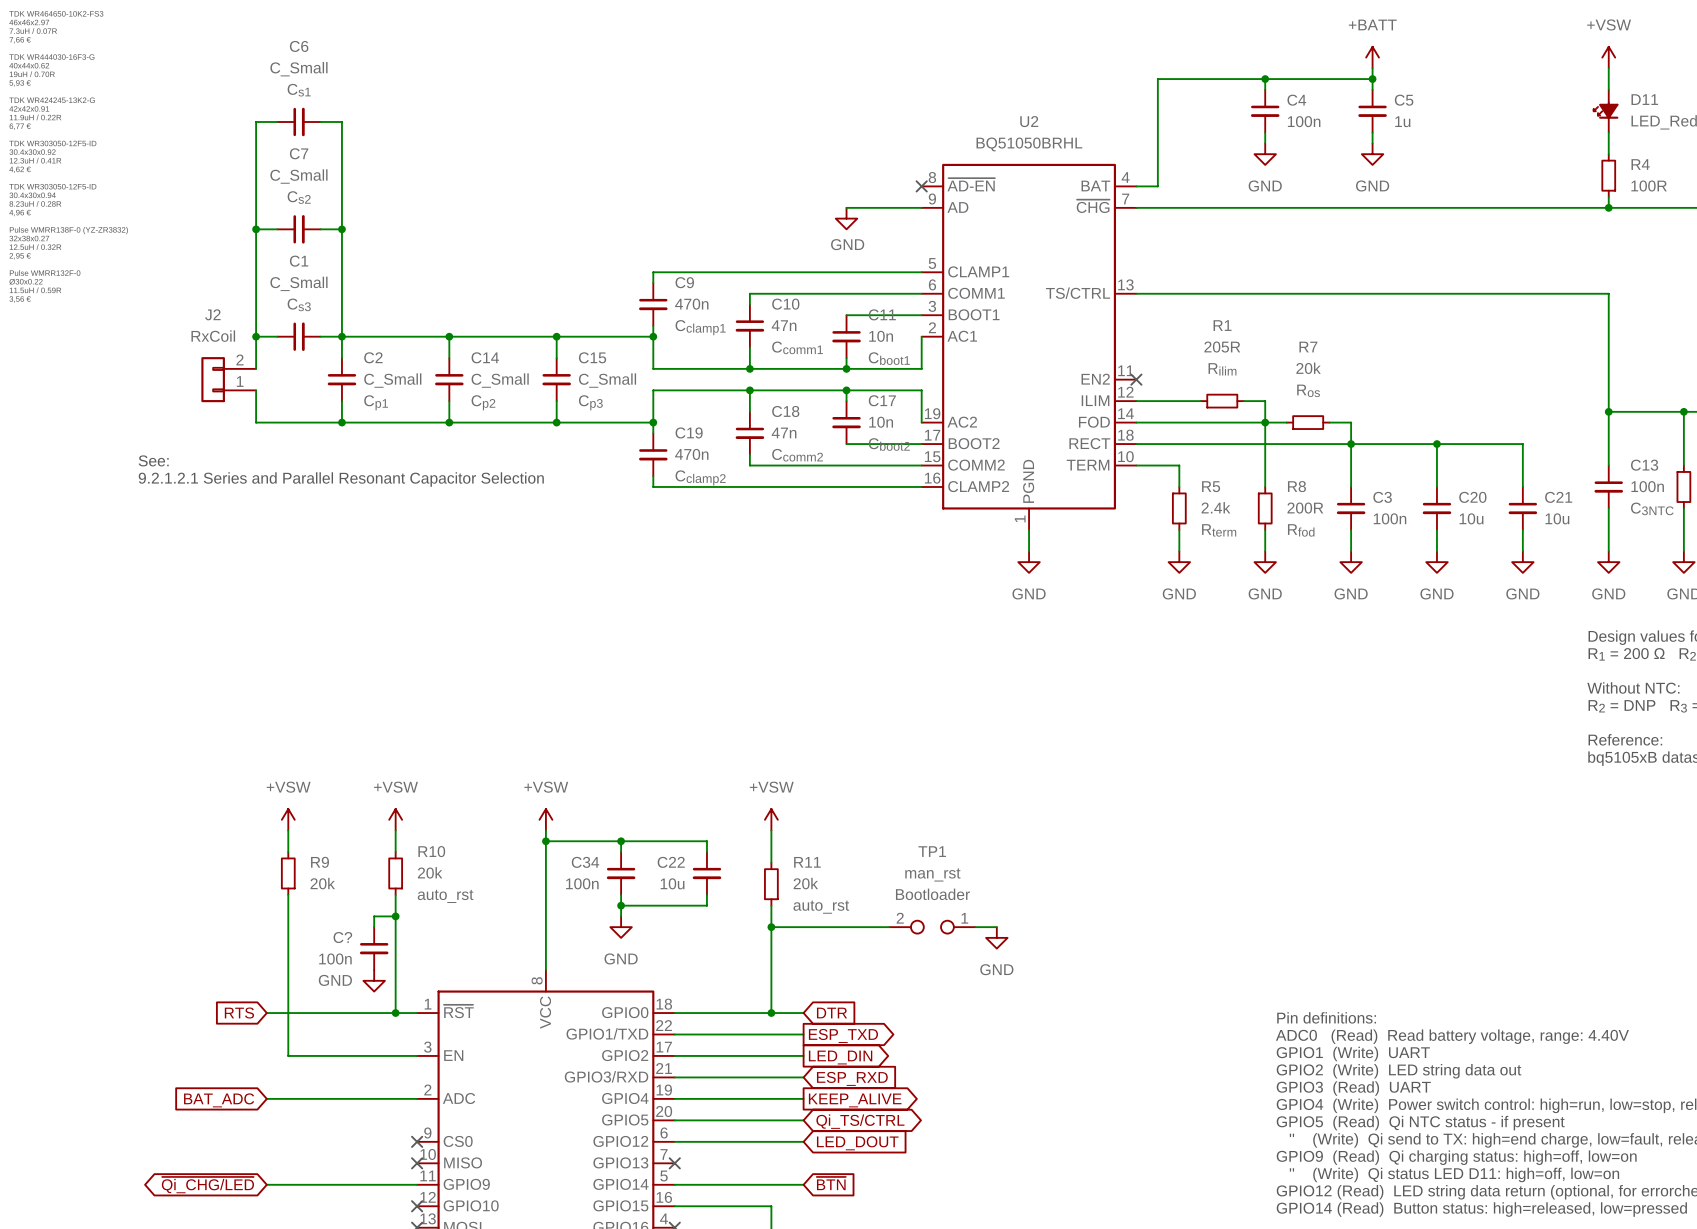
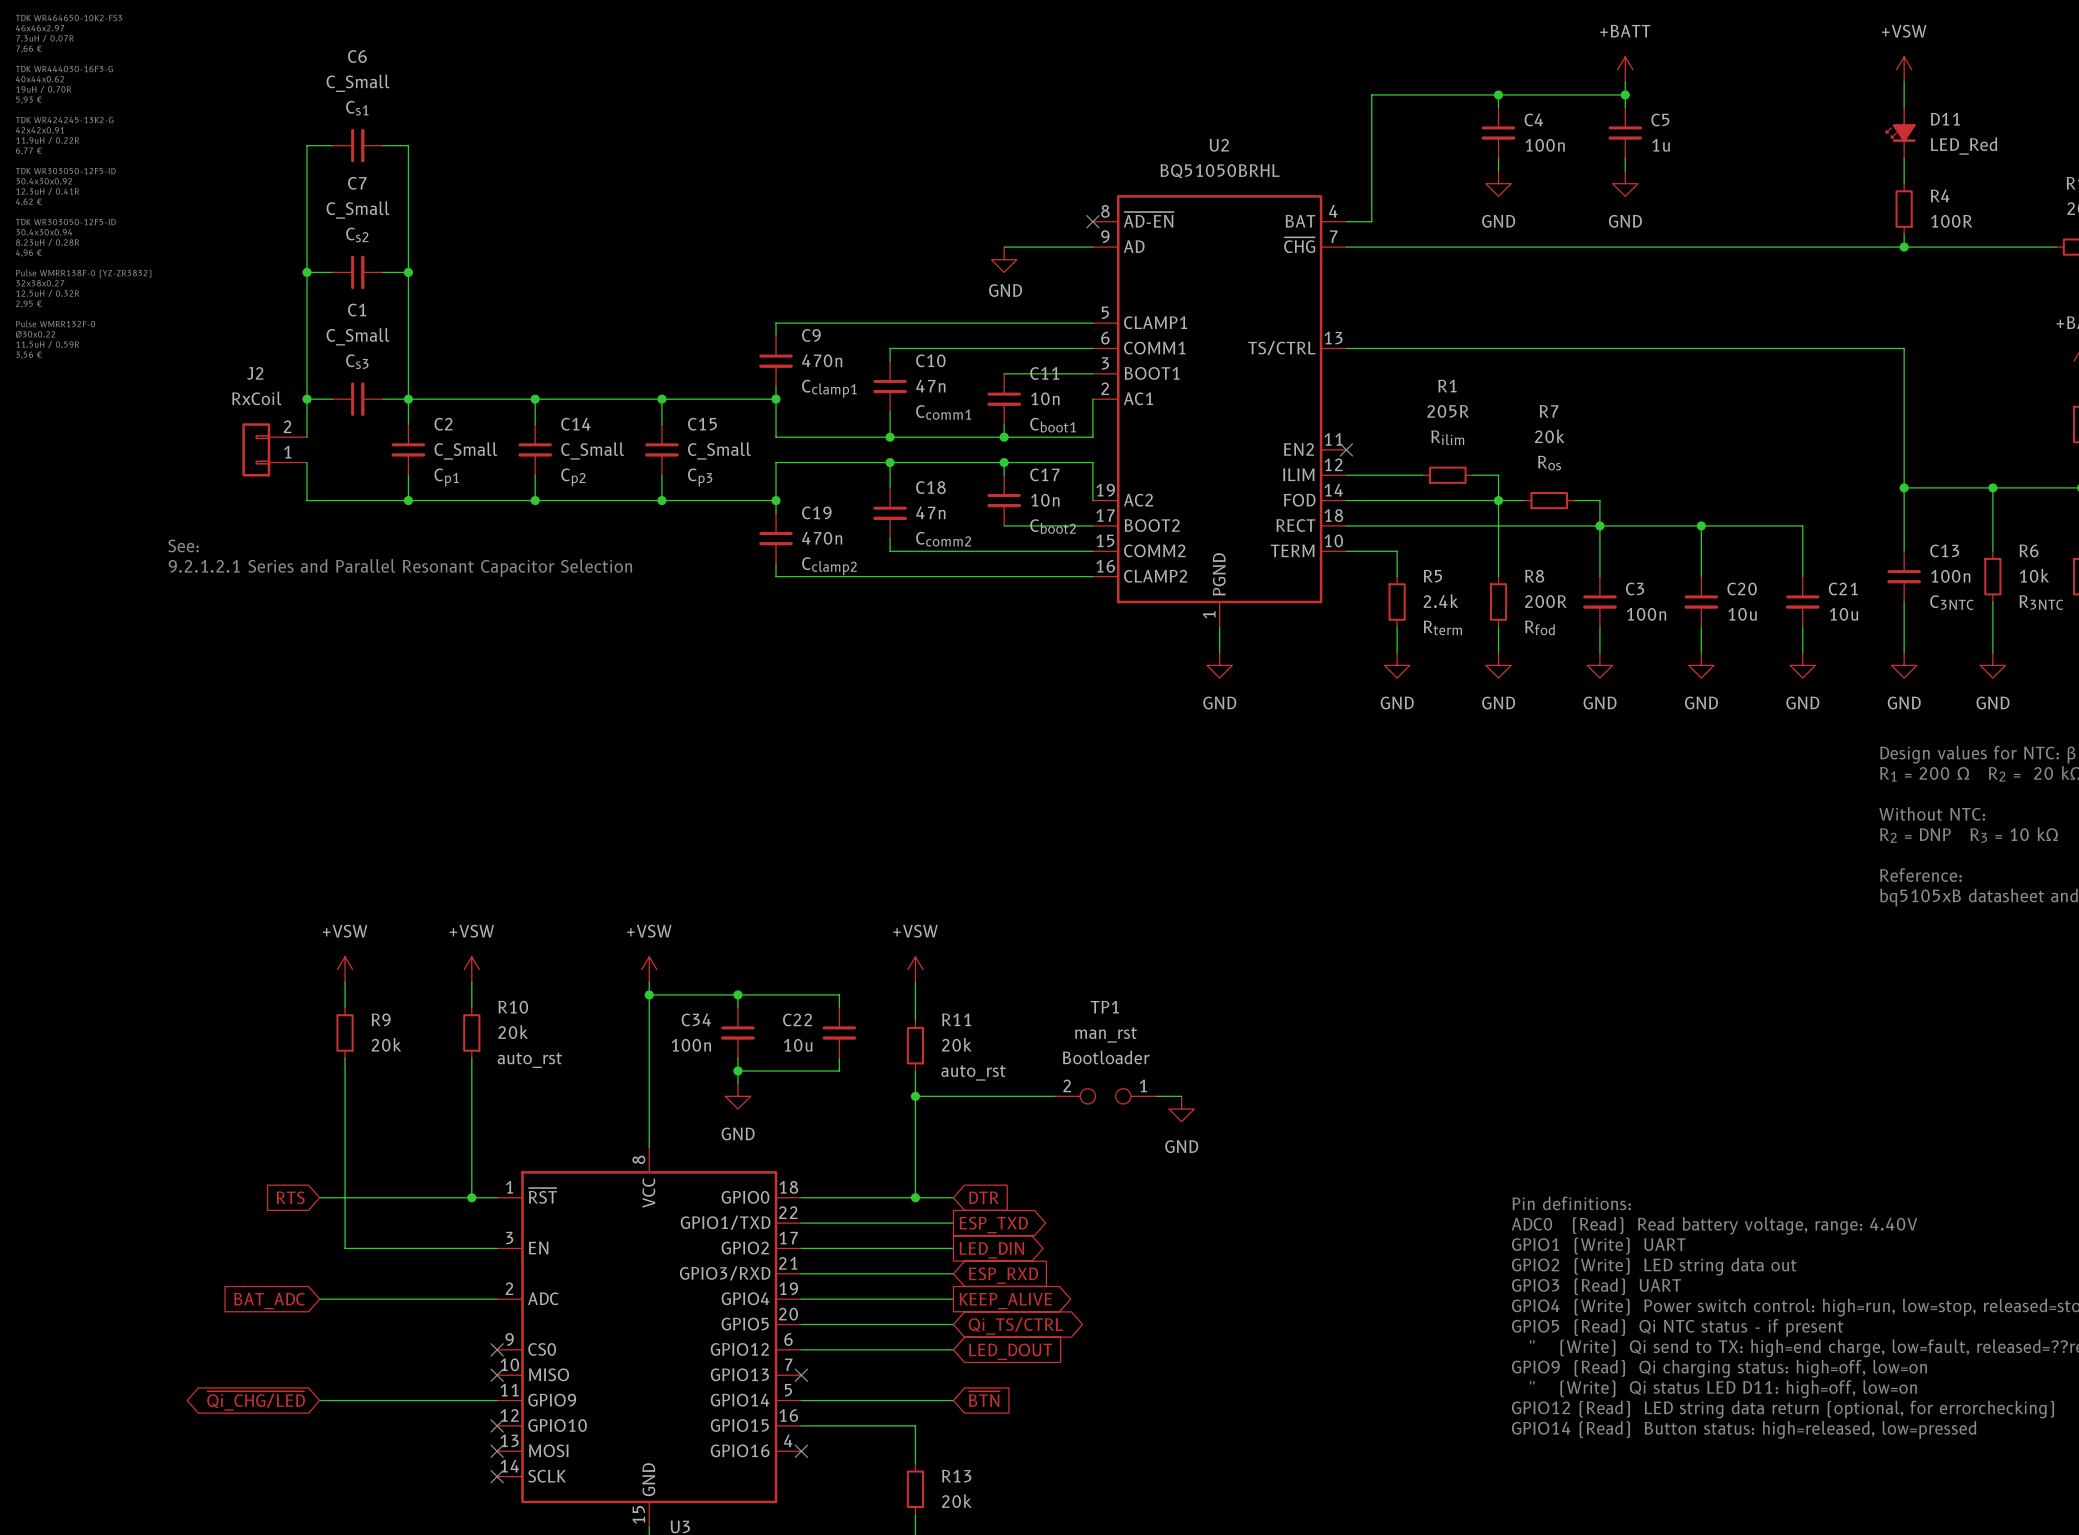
wire: (395, 916) (374, 916) (374, 927) -> none
junction: (395, 916) -> none
C?: 100n (374, 948) -> none
power symbol: GND (374, 980) -> none

